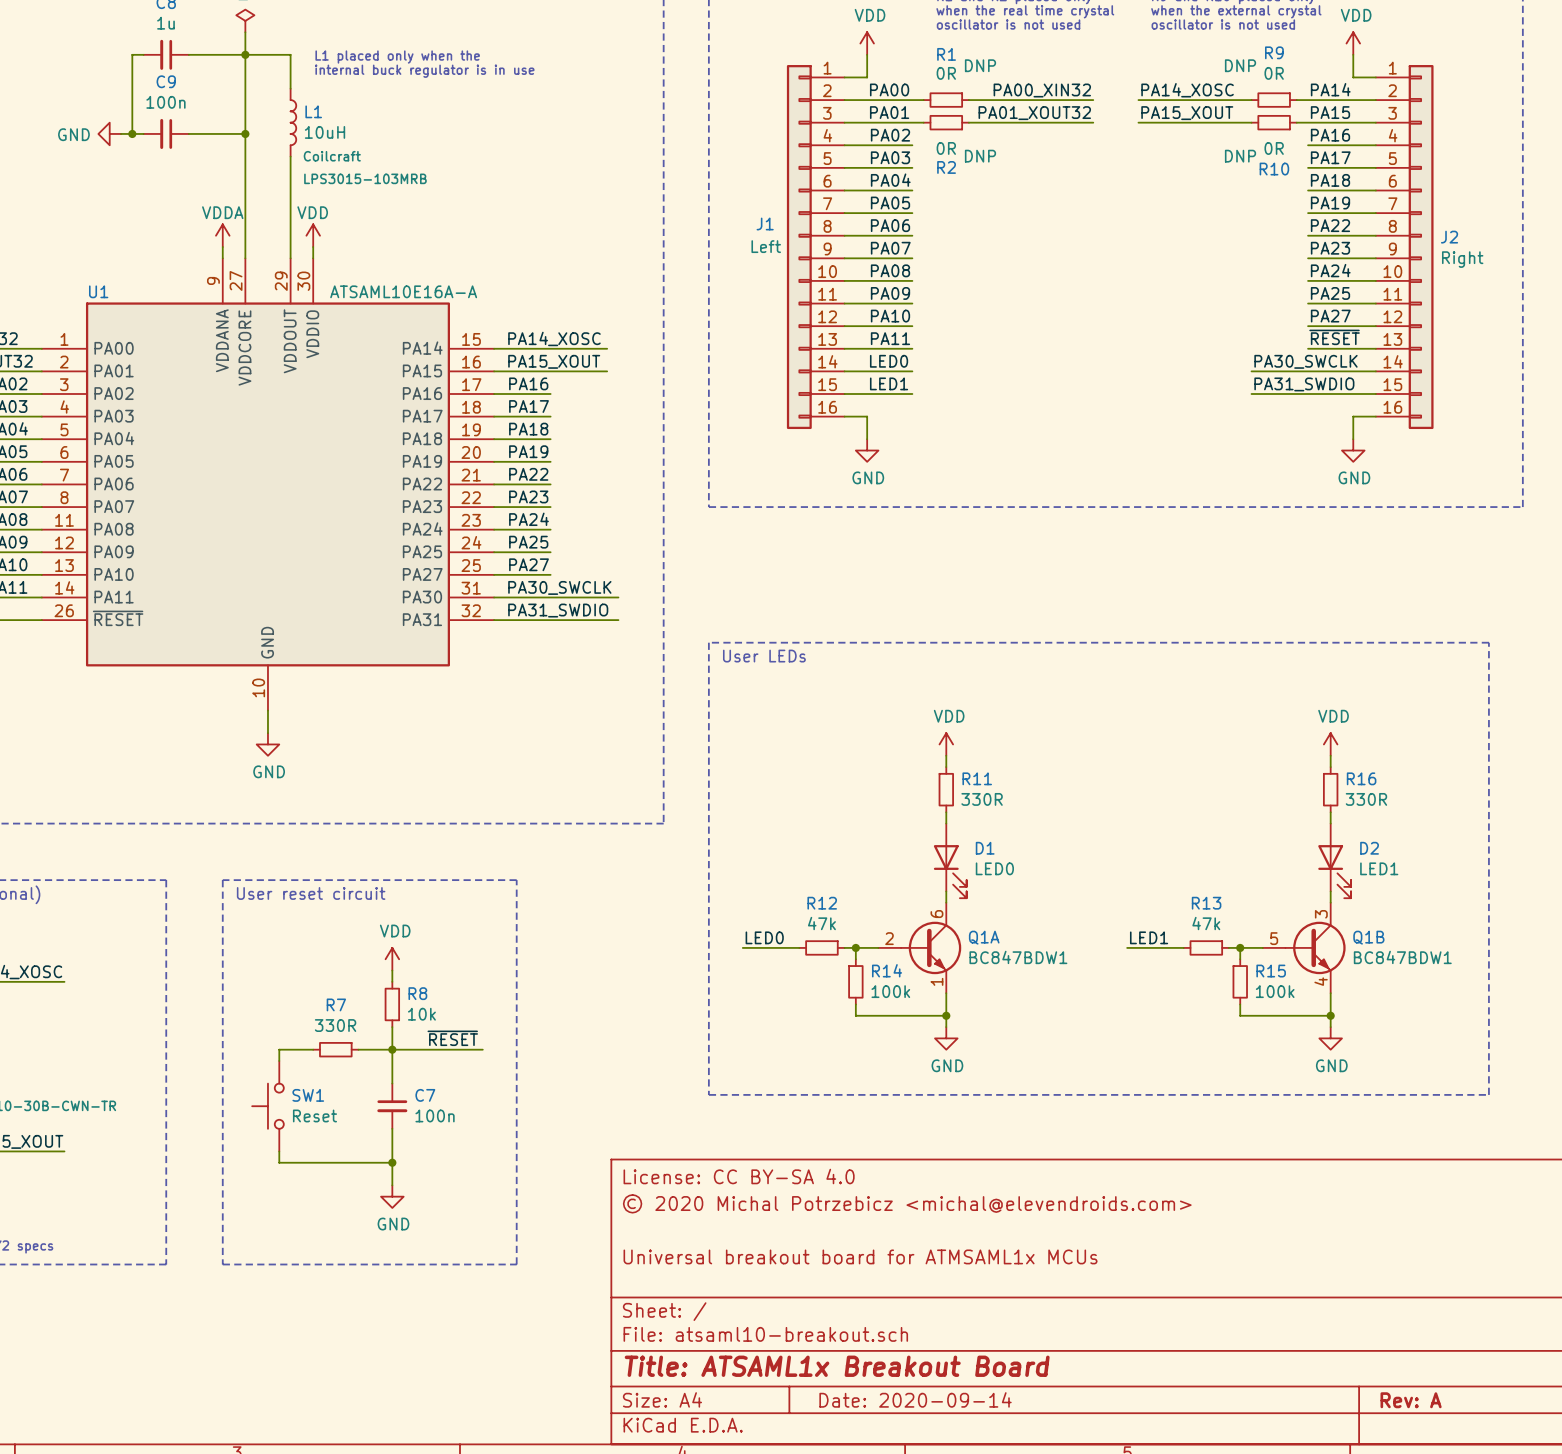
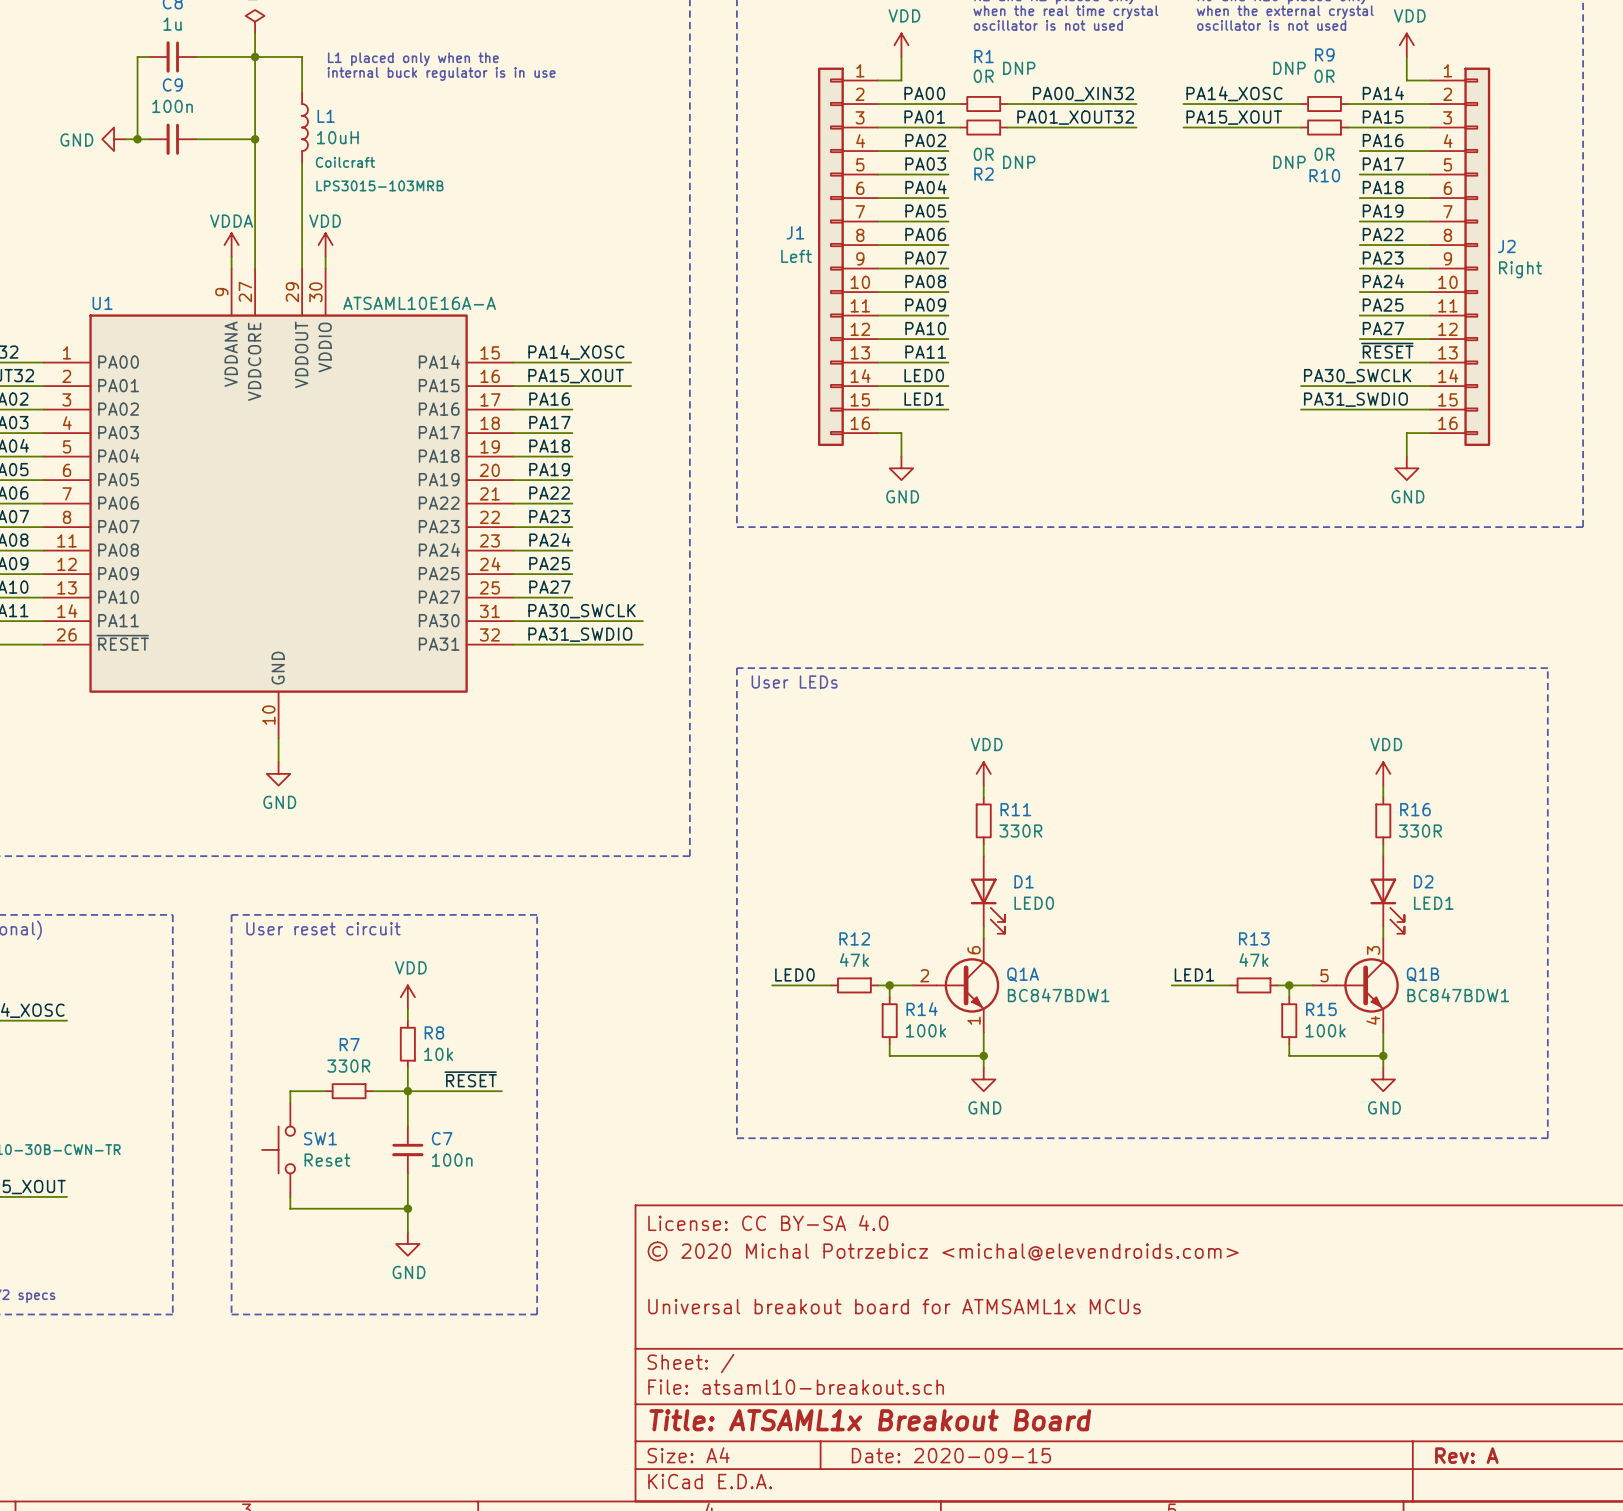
title block: Date: 2020-09-14 (915, 1399) -> Date: 2020-09-15 (951, 1455)

